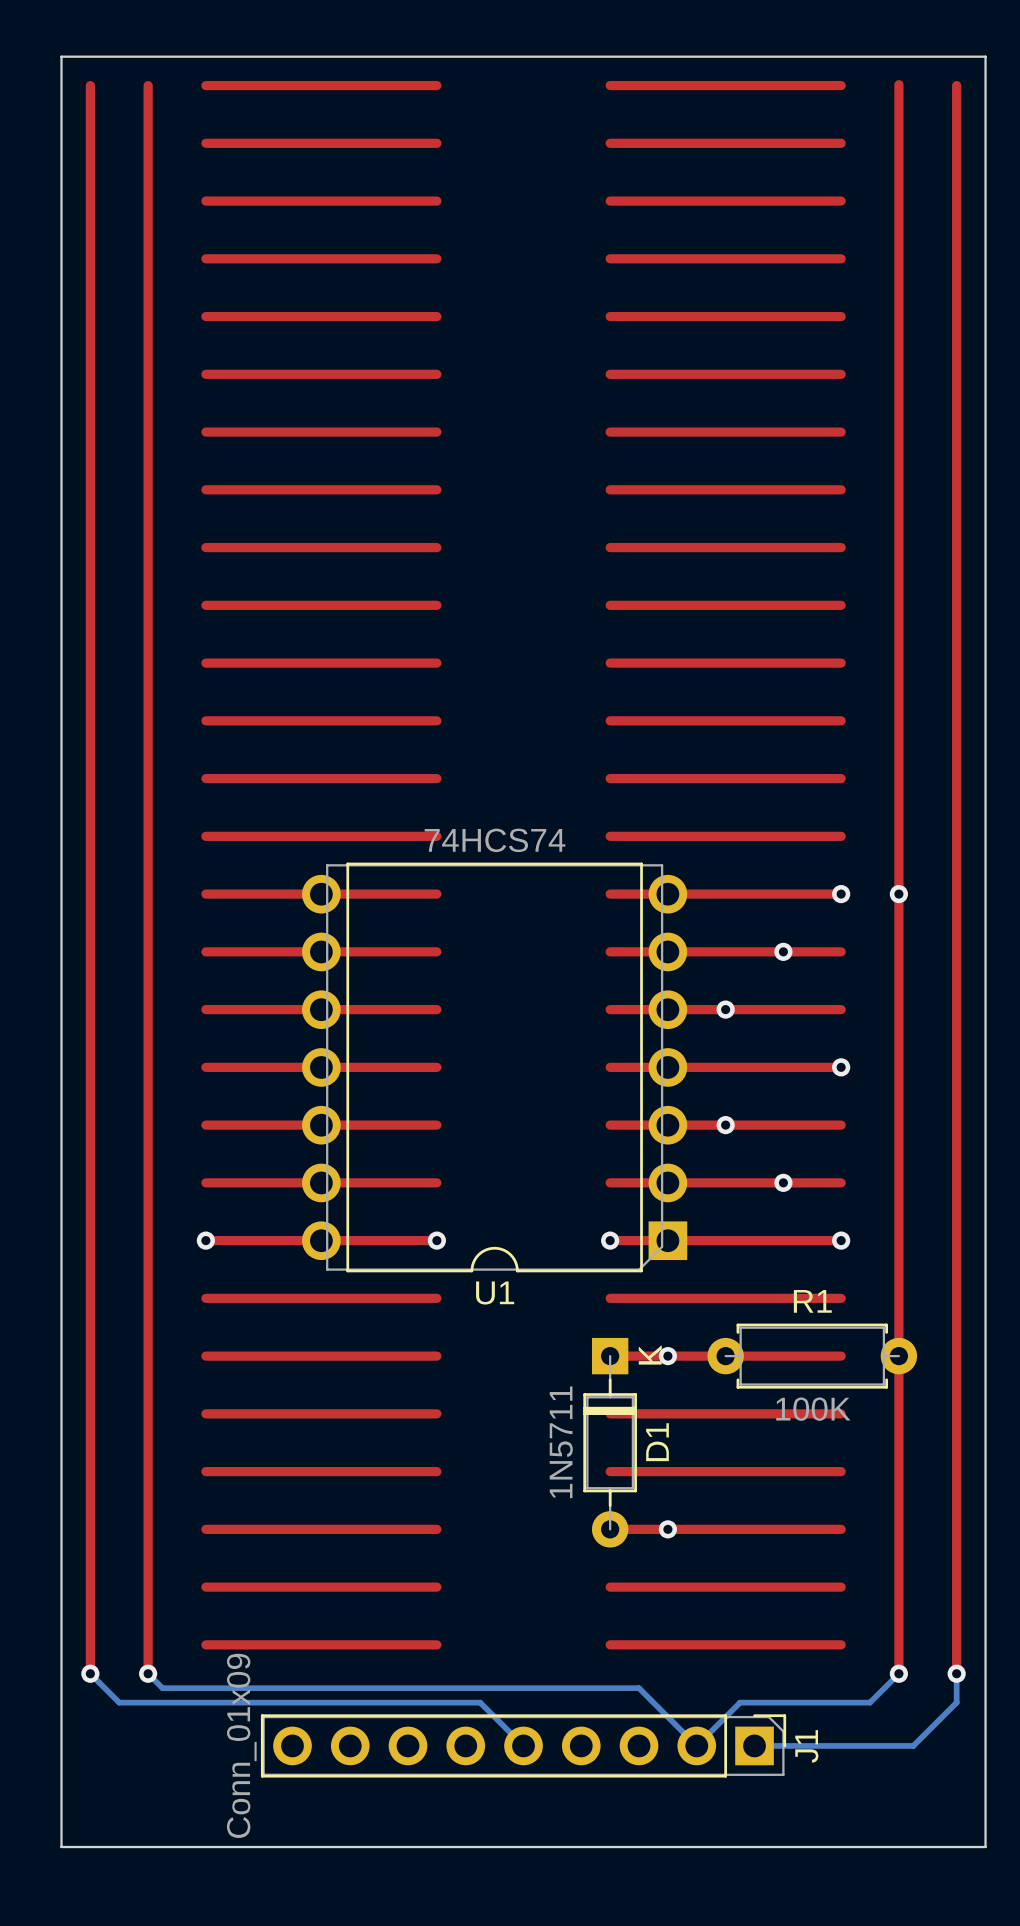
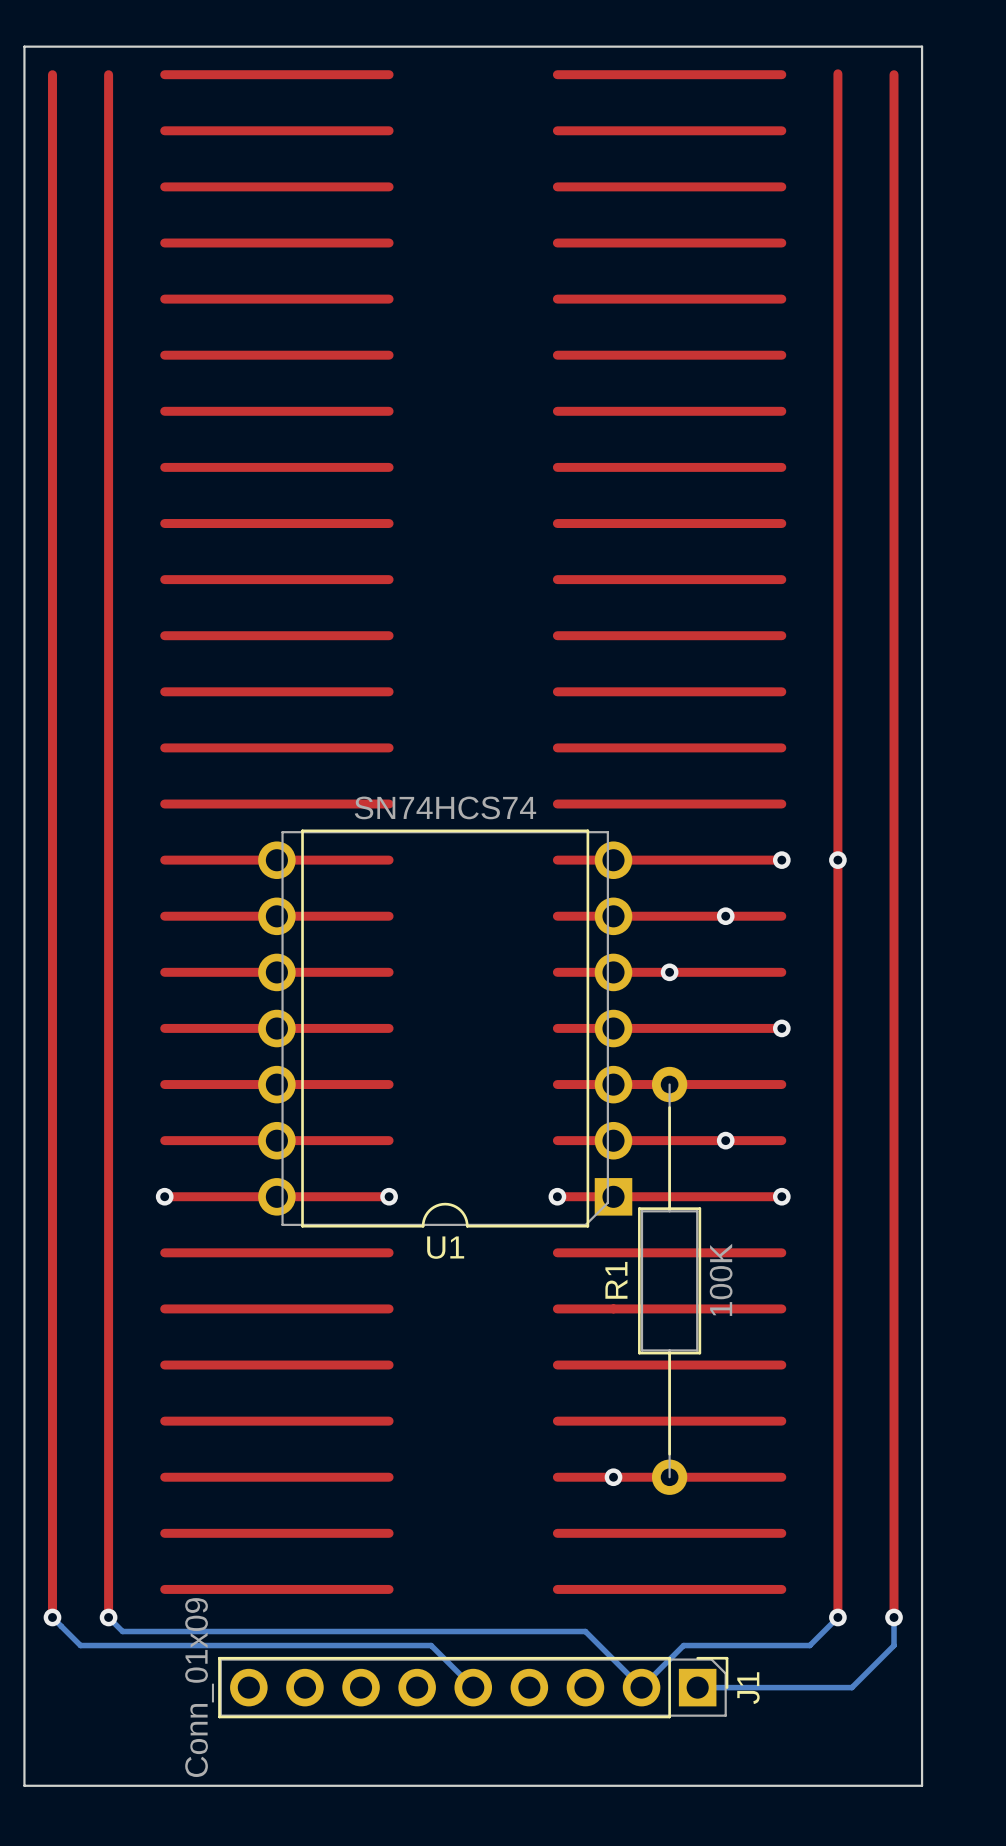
U1 value: 74HCS74 (495, 840) -> SN74HCS74 (445, 807)
via: (725, 1125) -> none
R1 name position: R1 (812, 1301) -> R1 (616, 1280)
R1 footprint: [707, 1323, 918, 1389] -> [638, 1066, 702, 1495]
via: (667, 1356) -> none
R1 value position: 100K (813, 1409) -> 100K (721, 1279)
D1: 1N5711 (610, 1442) -> none

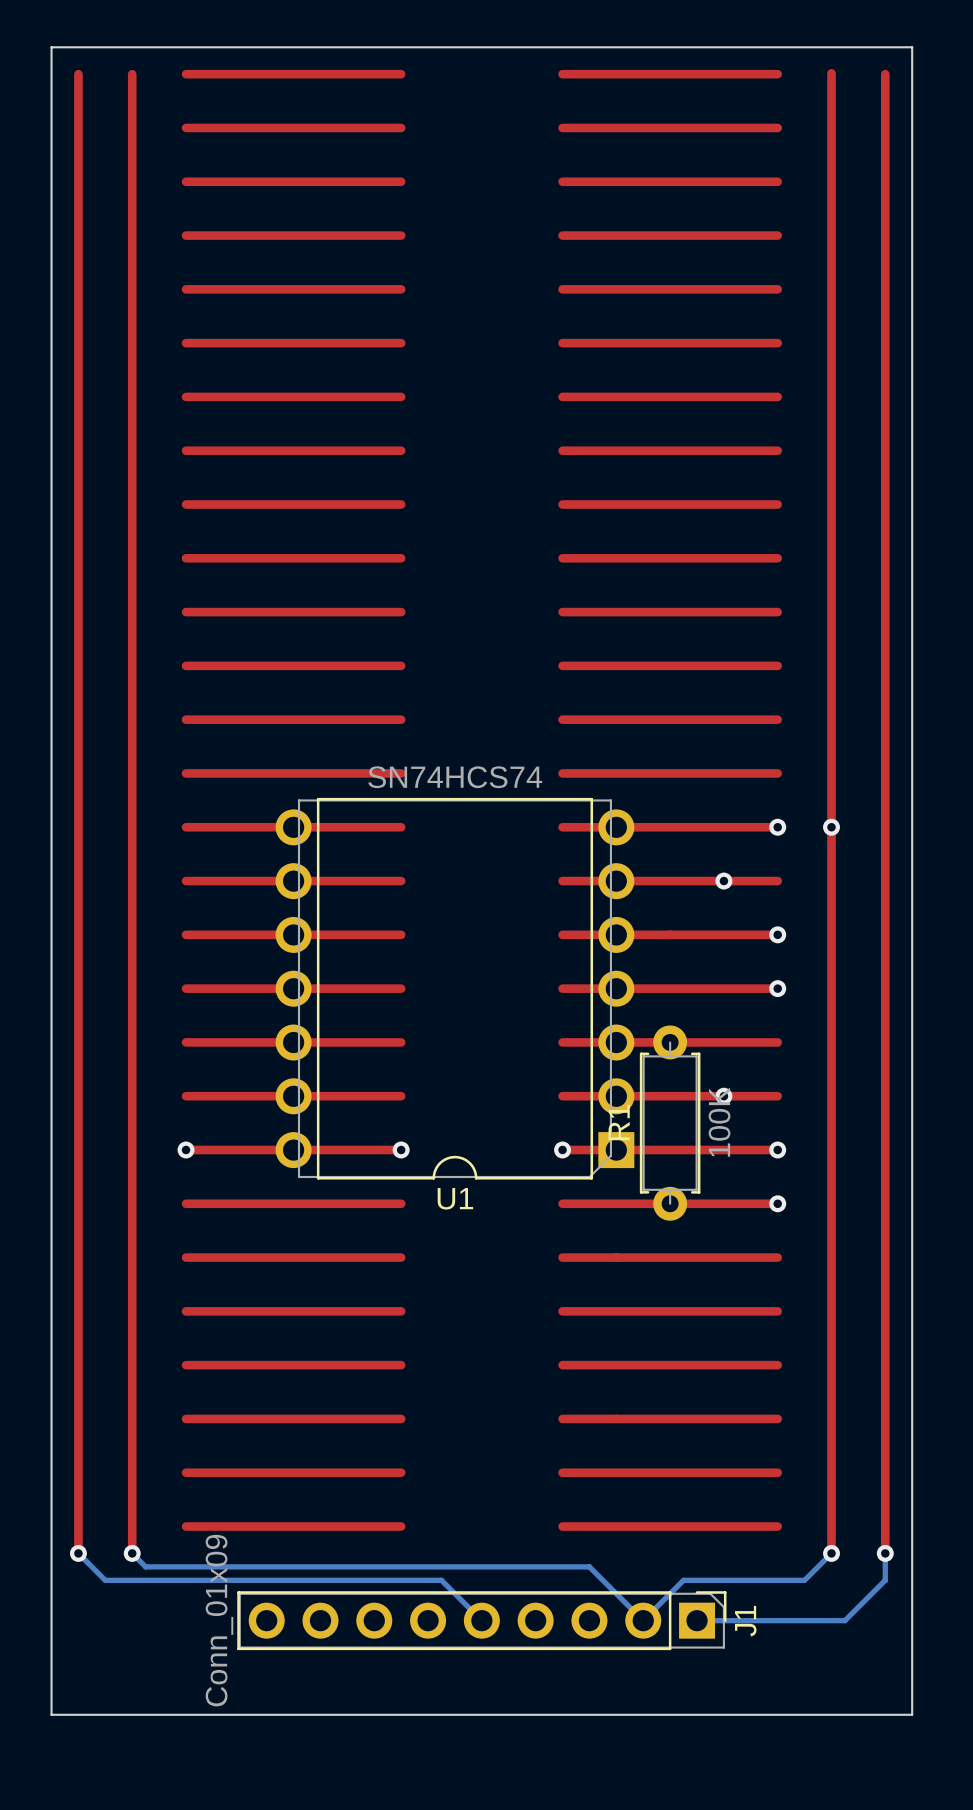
via position: (669, 972) -> (777, 934)
R1 footprint: [638, 1066, 702, 1495] -> [639, 1025, 701, 1221]
via: none -> (777, 1203)
via: (613, 1477) -> none

